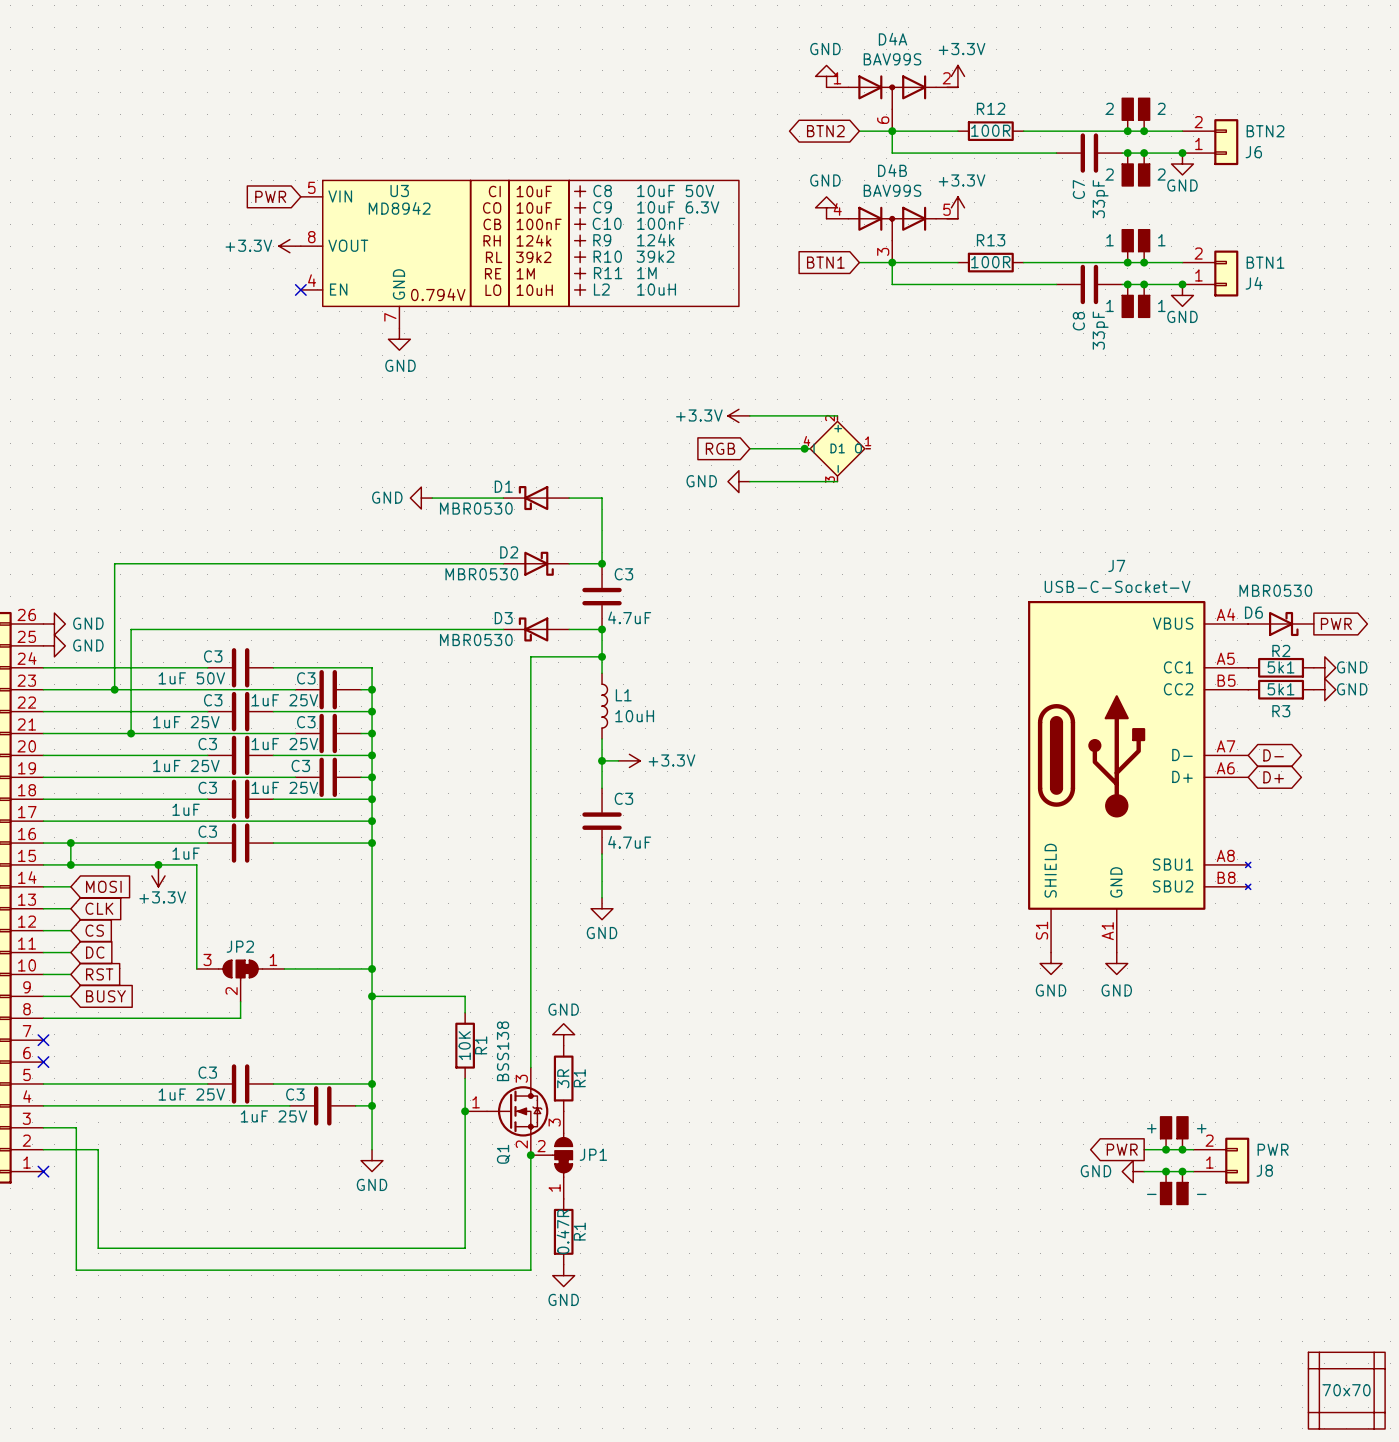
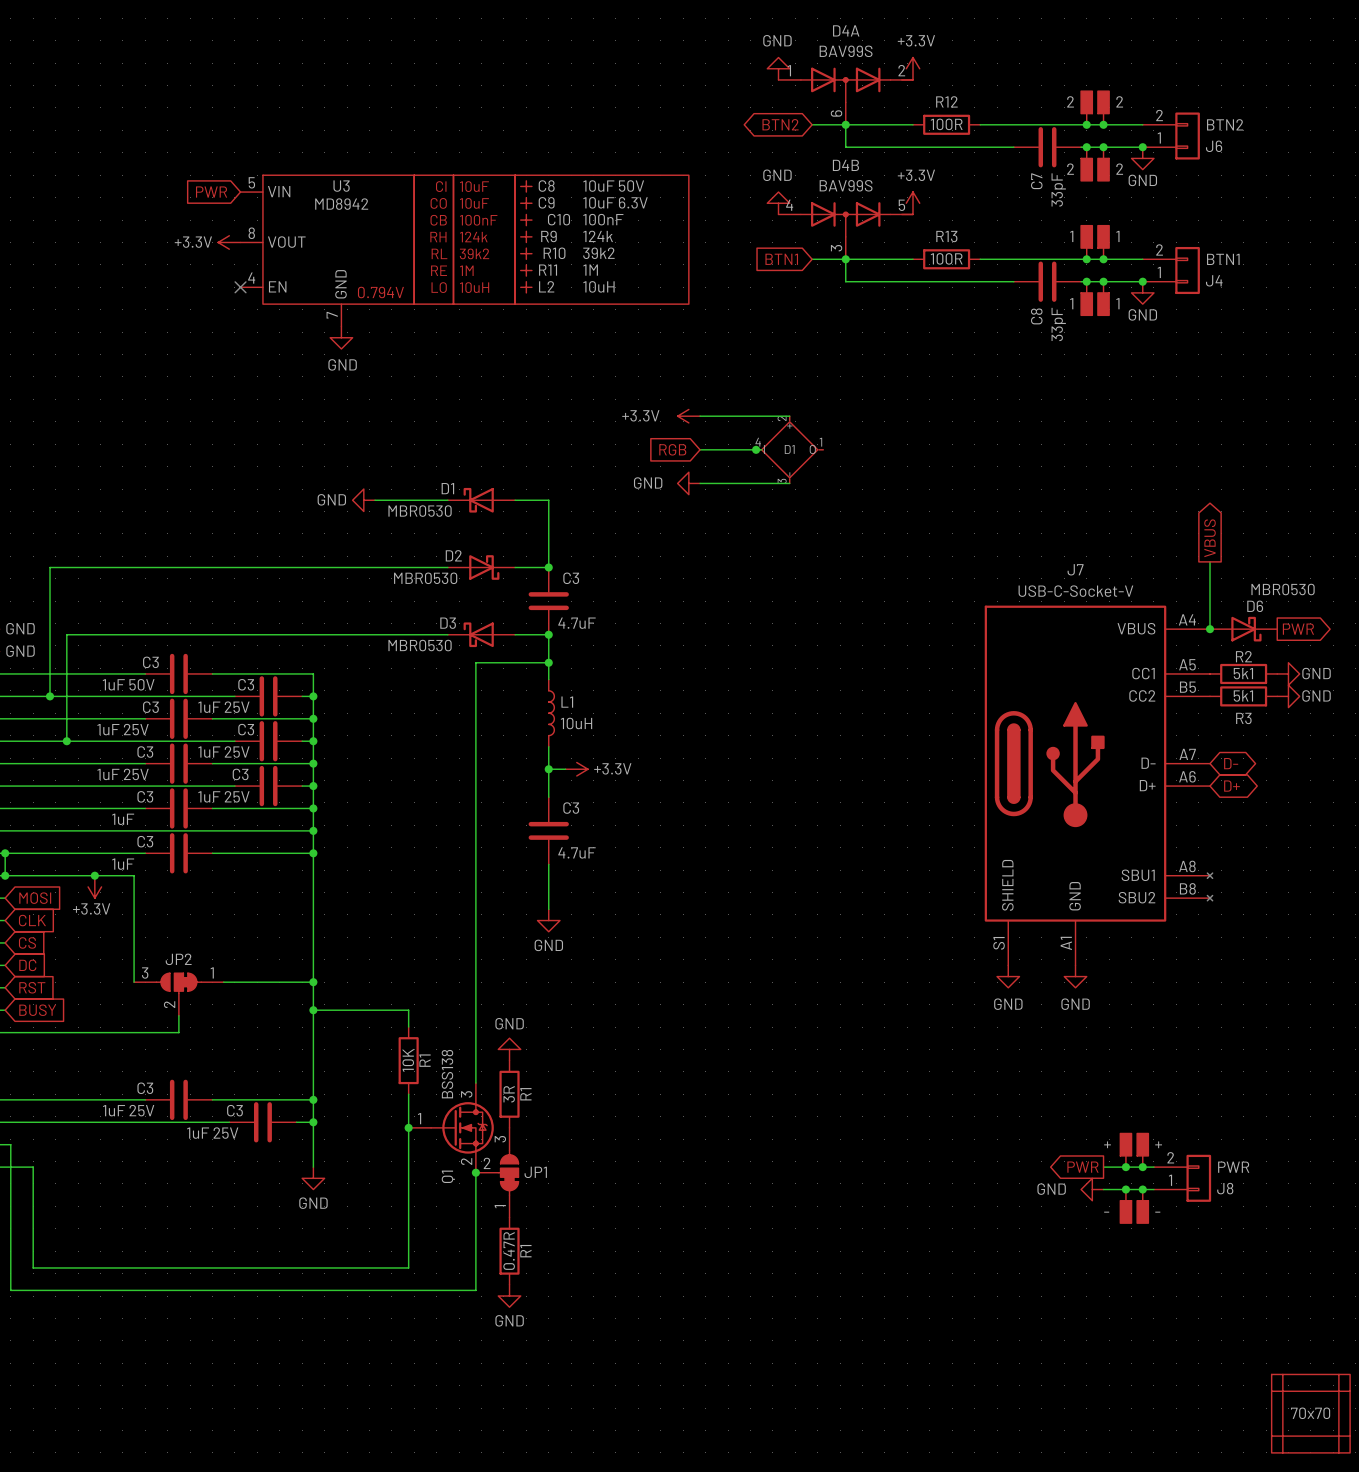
global label: none -> VBUS (1210, 538)
wire: none -> (1210, 561) (1210, 629)
D6 value position: MBR0530 (1275, 590) -> MBR0530 (1283, 589)
D6 name position: D6 (1253, 612) -> D6 (1255, 606)
junction: none -> (1210, 629)

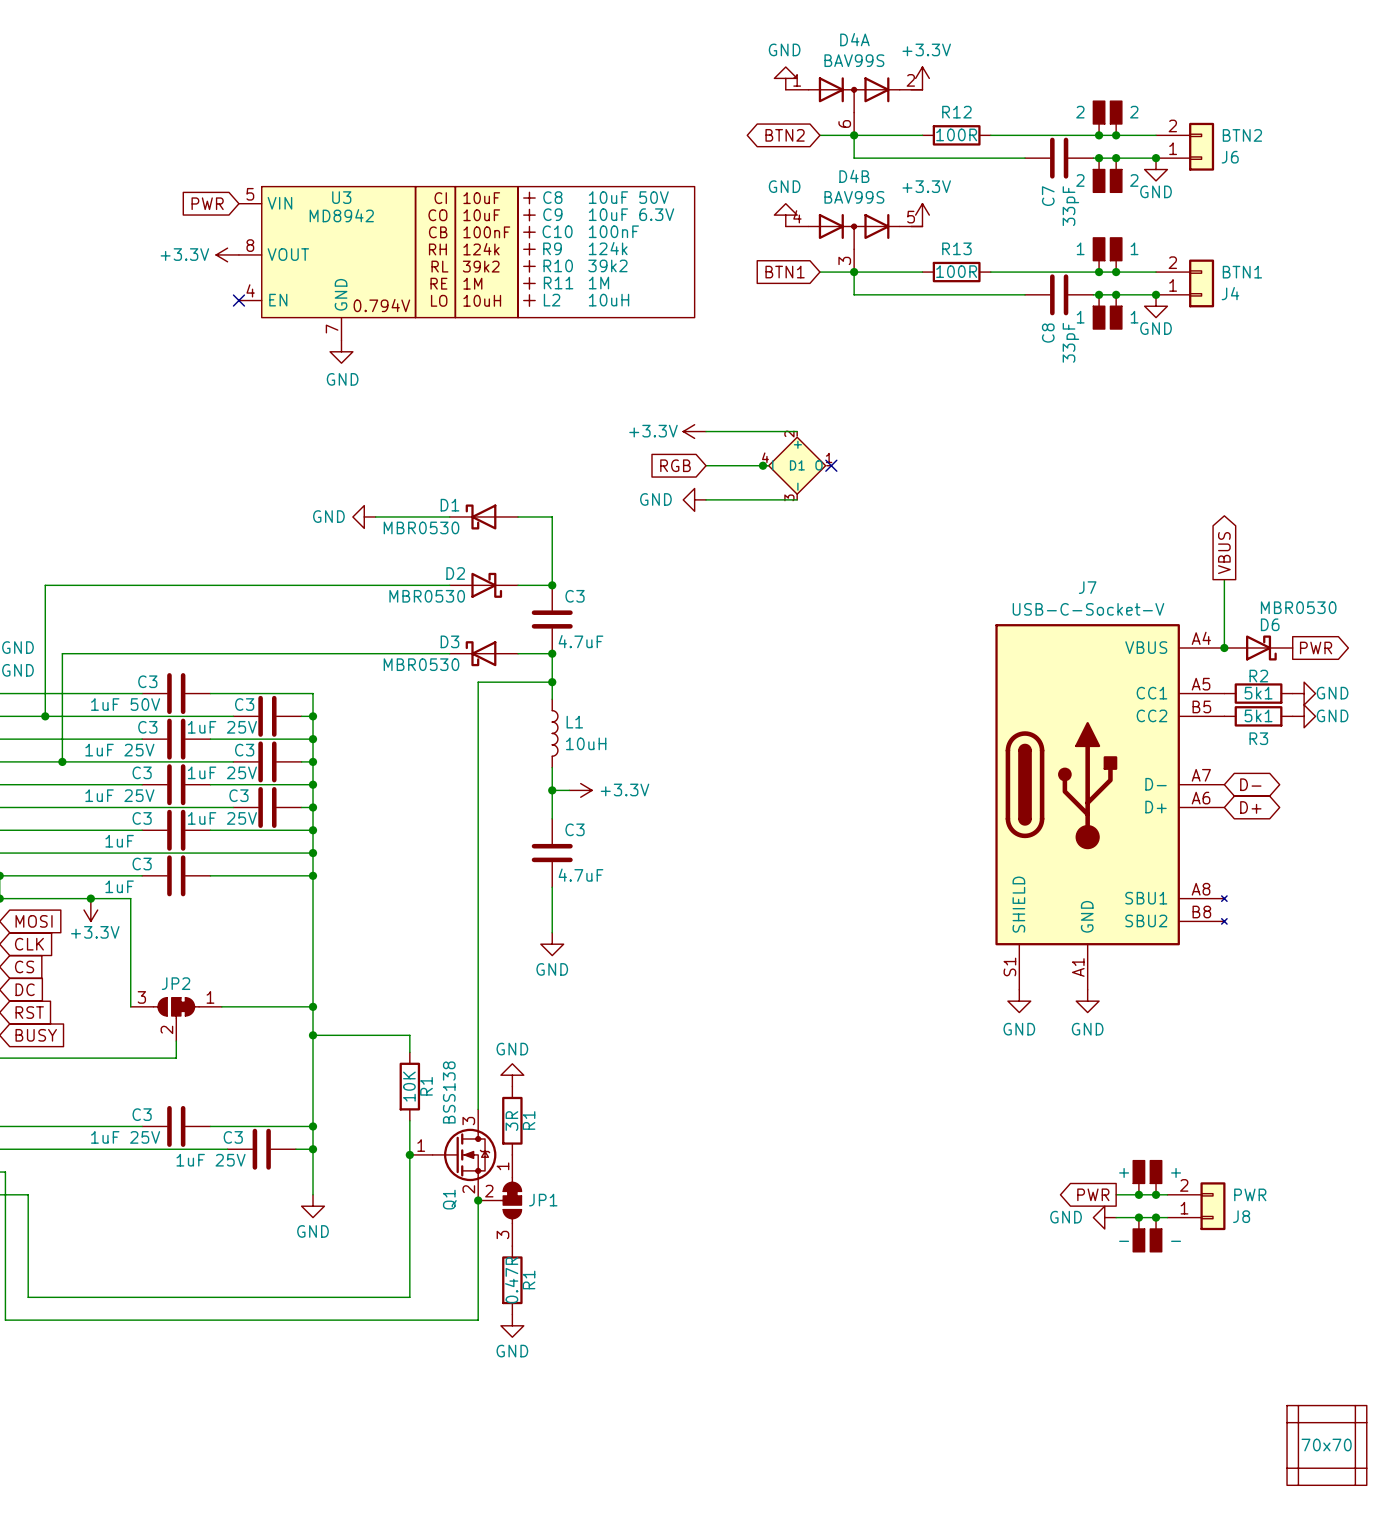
no-connect mark: none -> (831, 465)
JP1 flip: as is (508, 1172) -> up-down (511, 1200)

